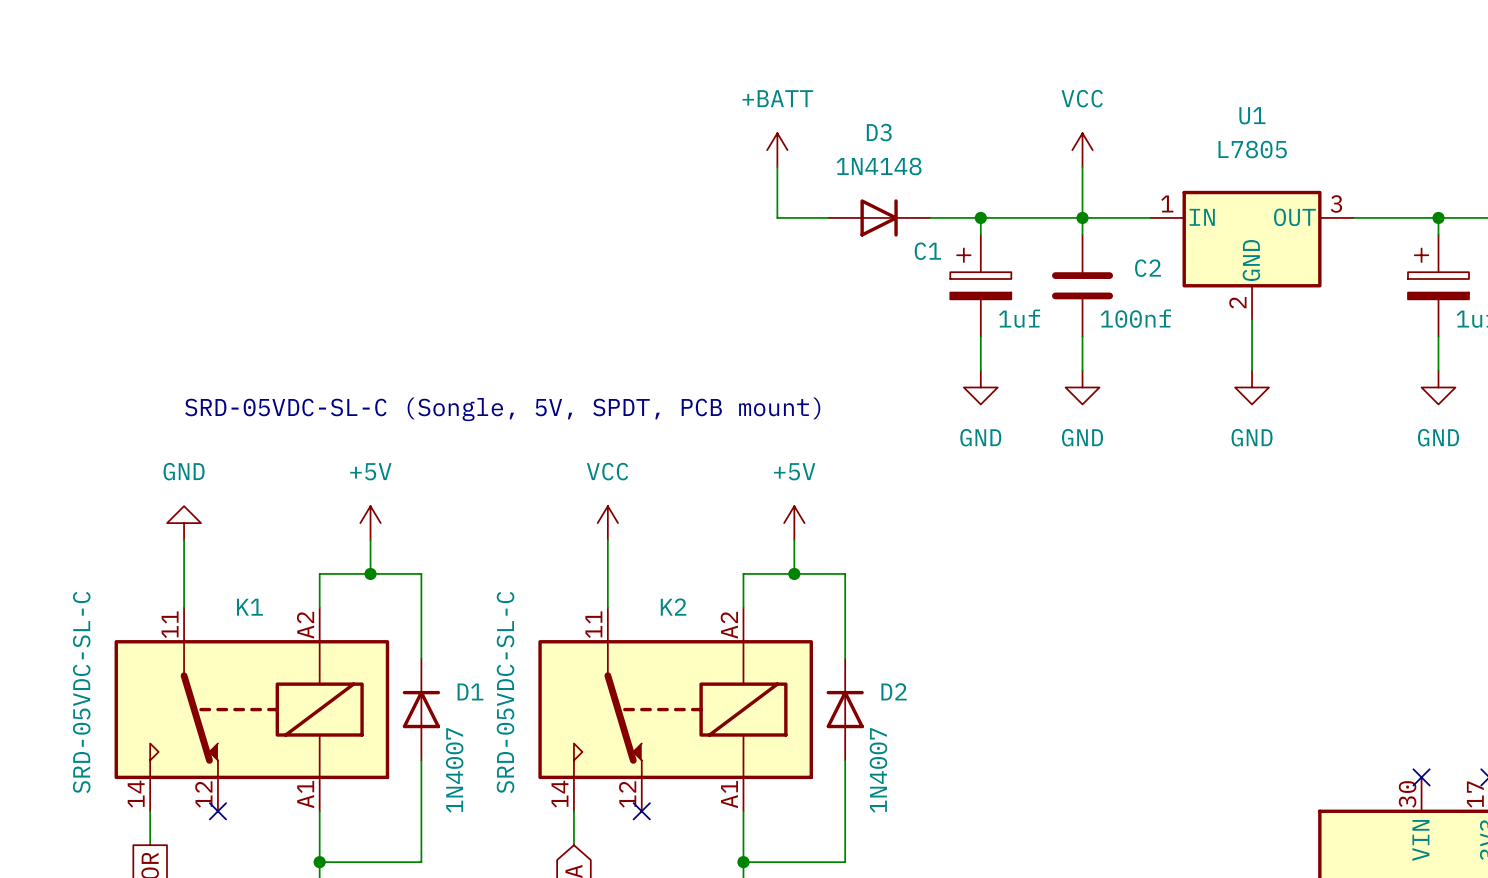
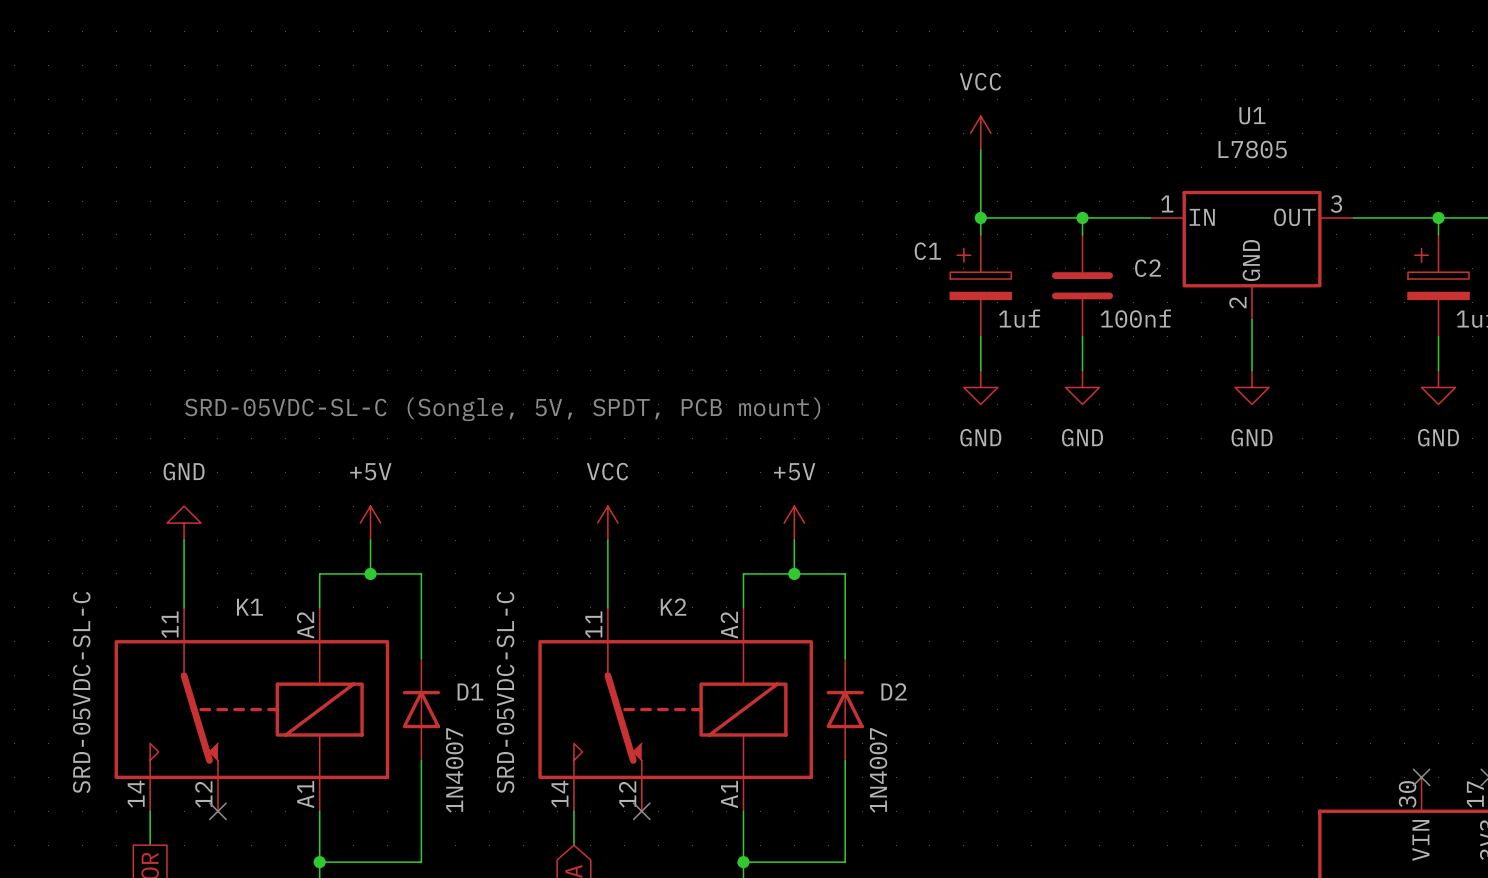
power symbol: +BATT (777, 150) -> none
power symbol position: VCC (1082, 150) -> VCC (980, 133)
wire: (777, 167) (777, 217) (828, 217) -> none
wire: (1082, 167) (1082, 217) -> none
D3: 1N4148 (879, 217) -> none
wire: (929, 217) (980, 217) -> (980, 150) (980, 217)

